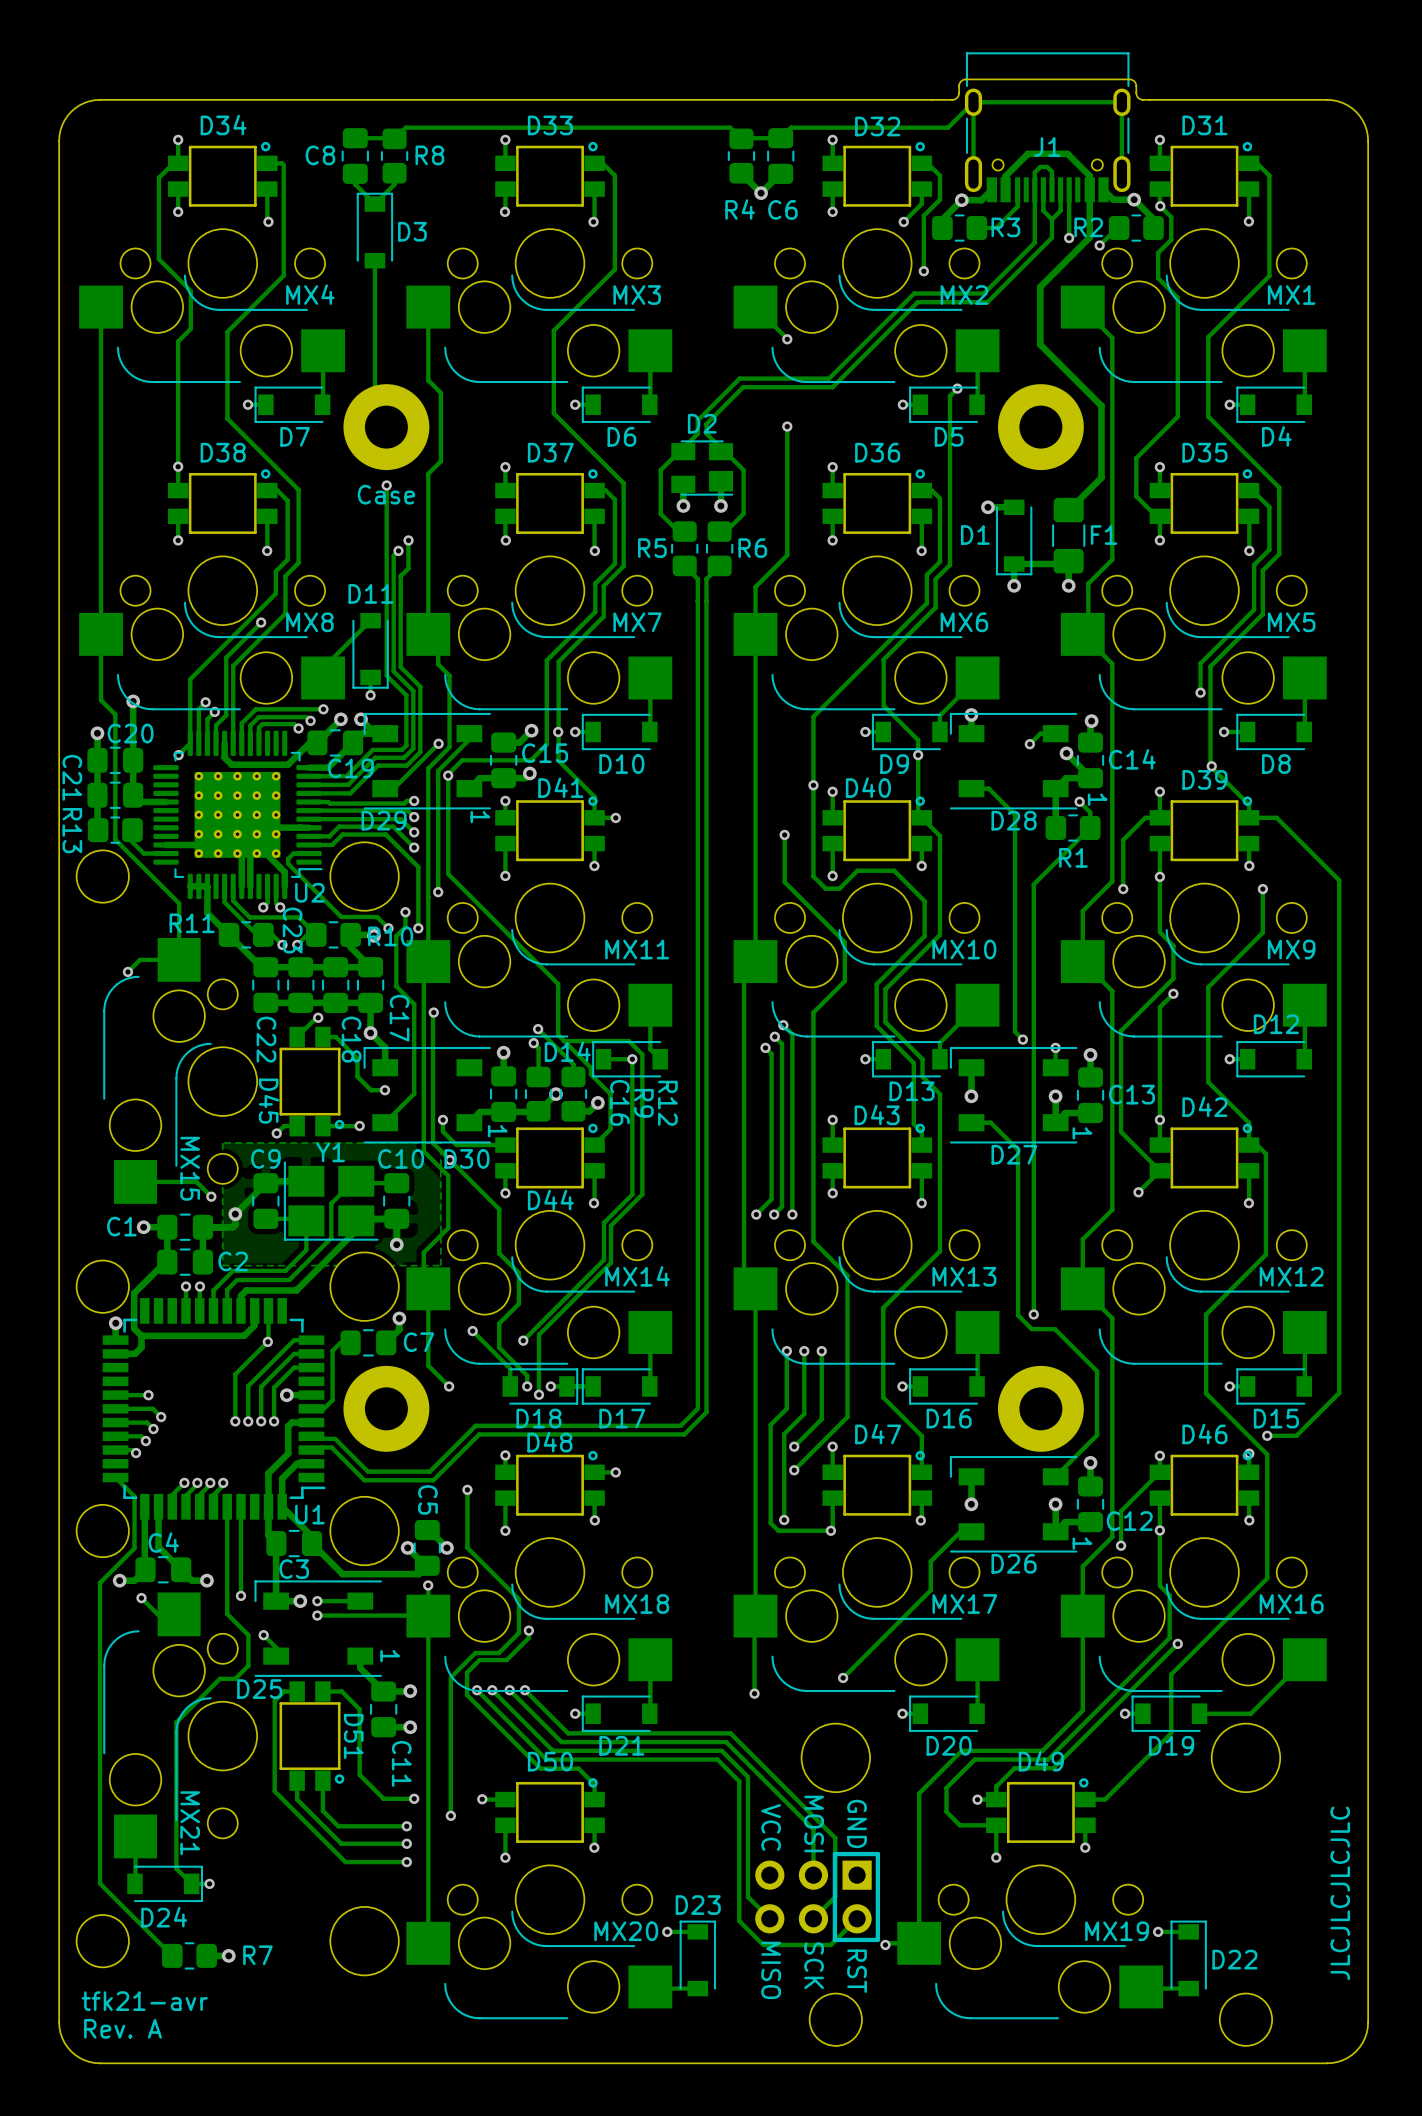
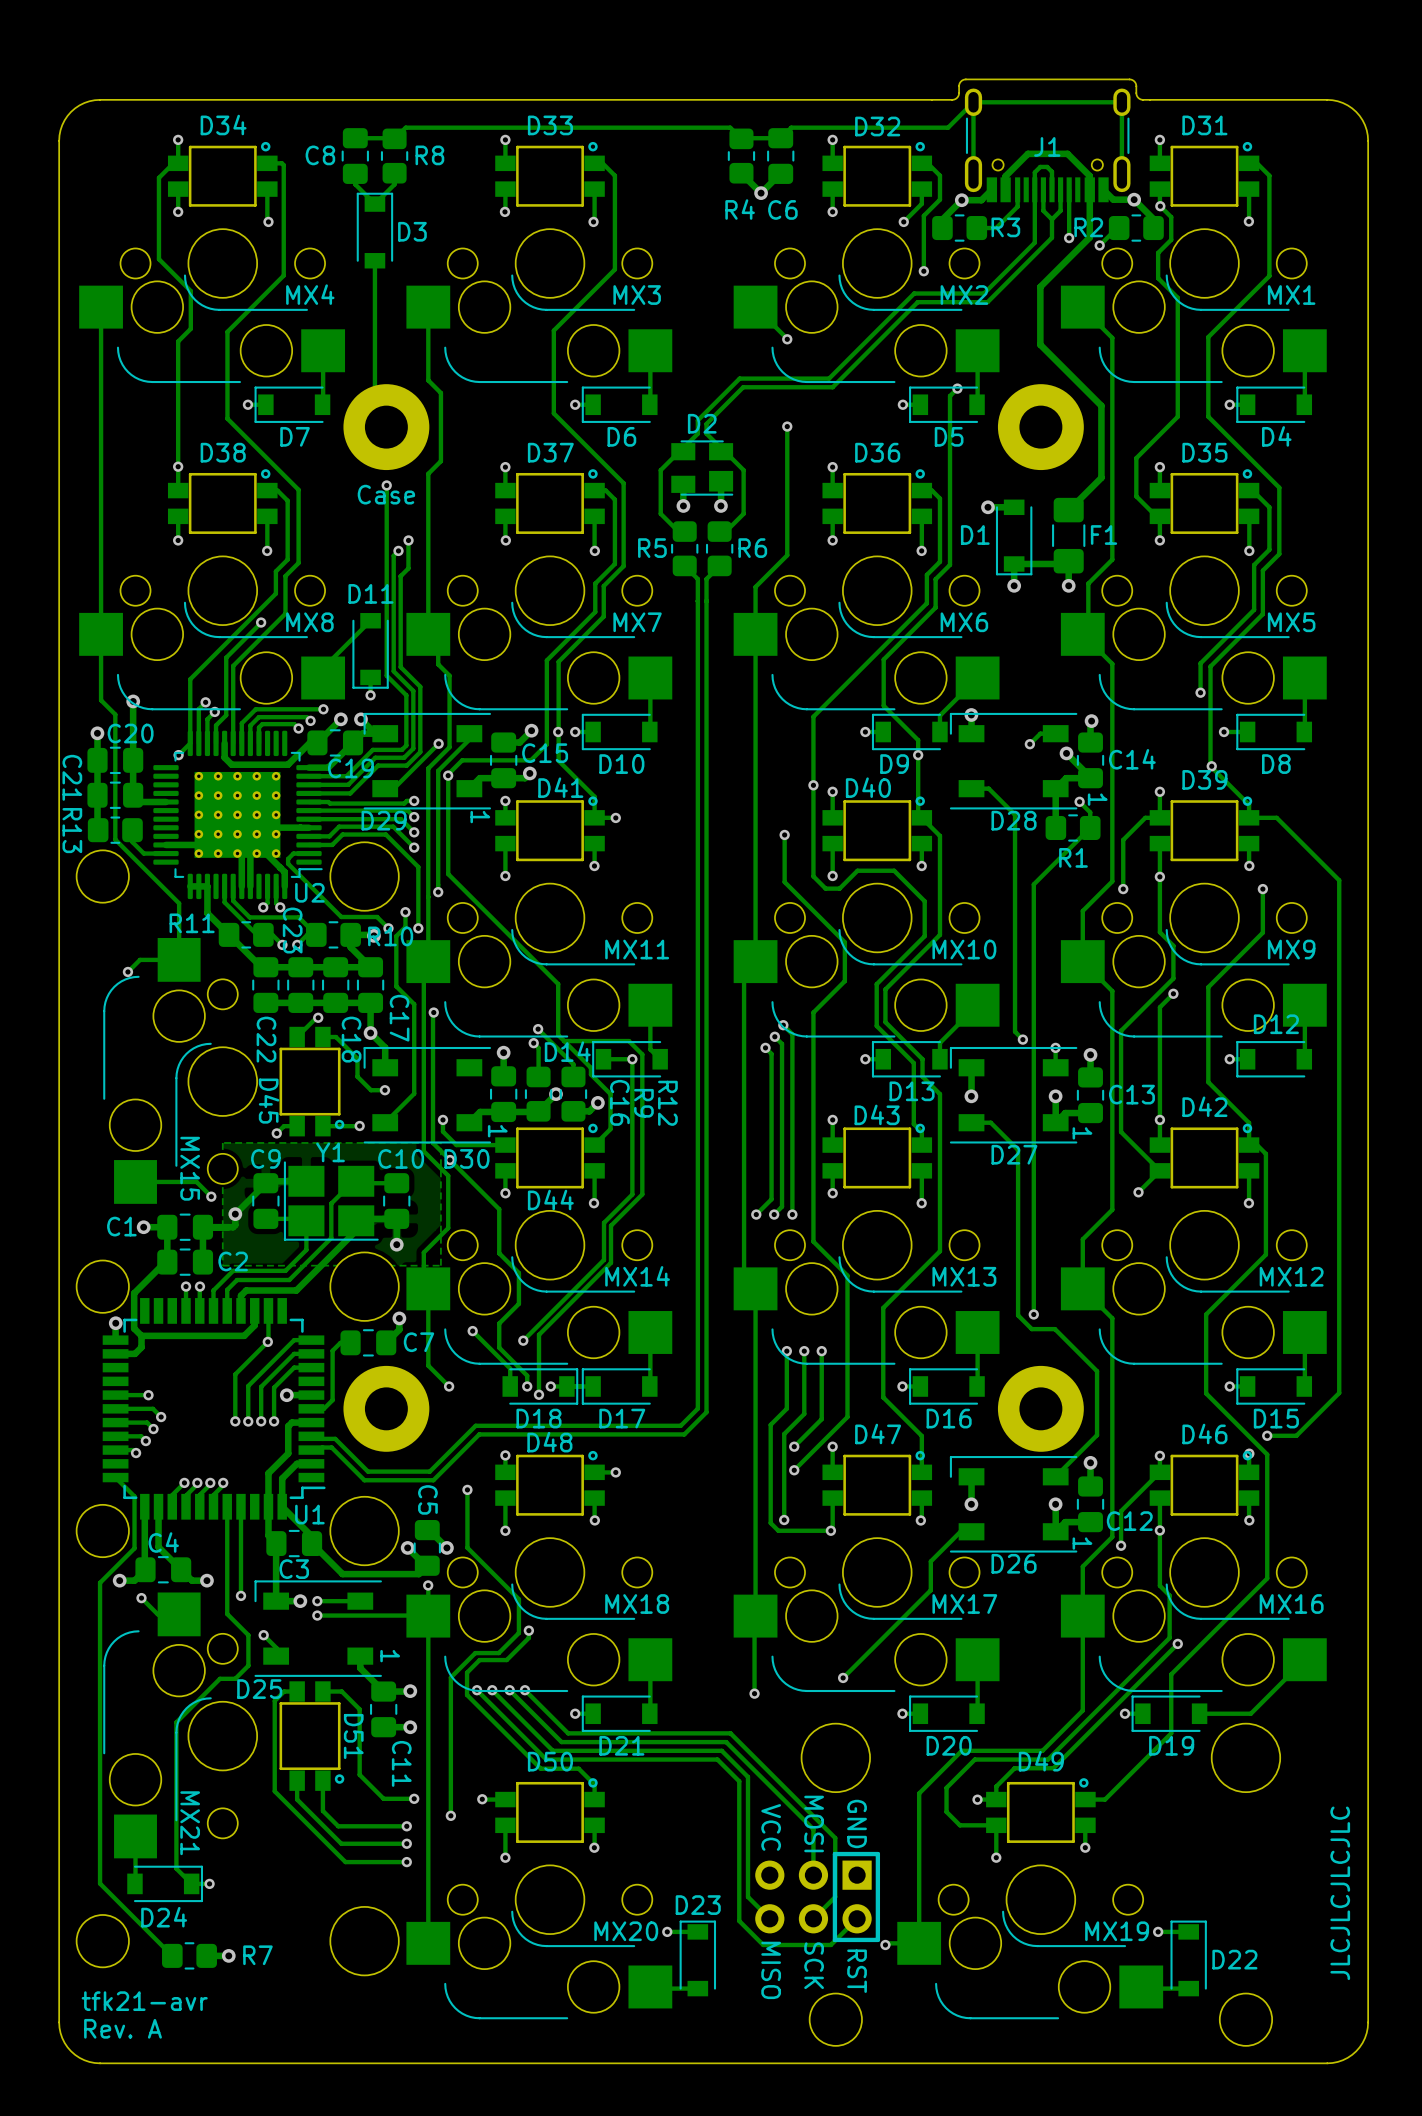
J1 footprint: [964, 52, 1131, 203] -> [964, 88, 1131, 203]

